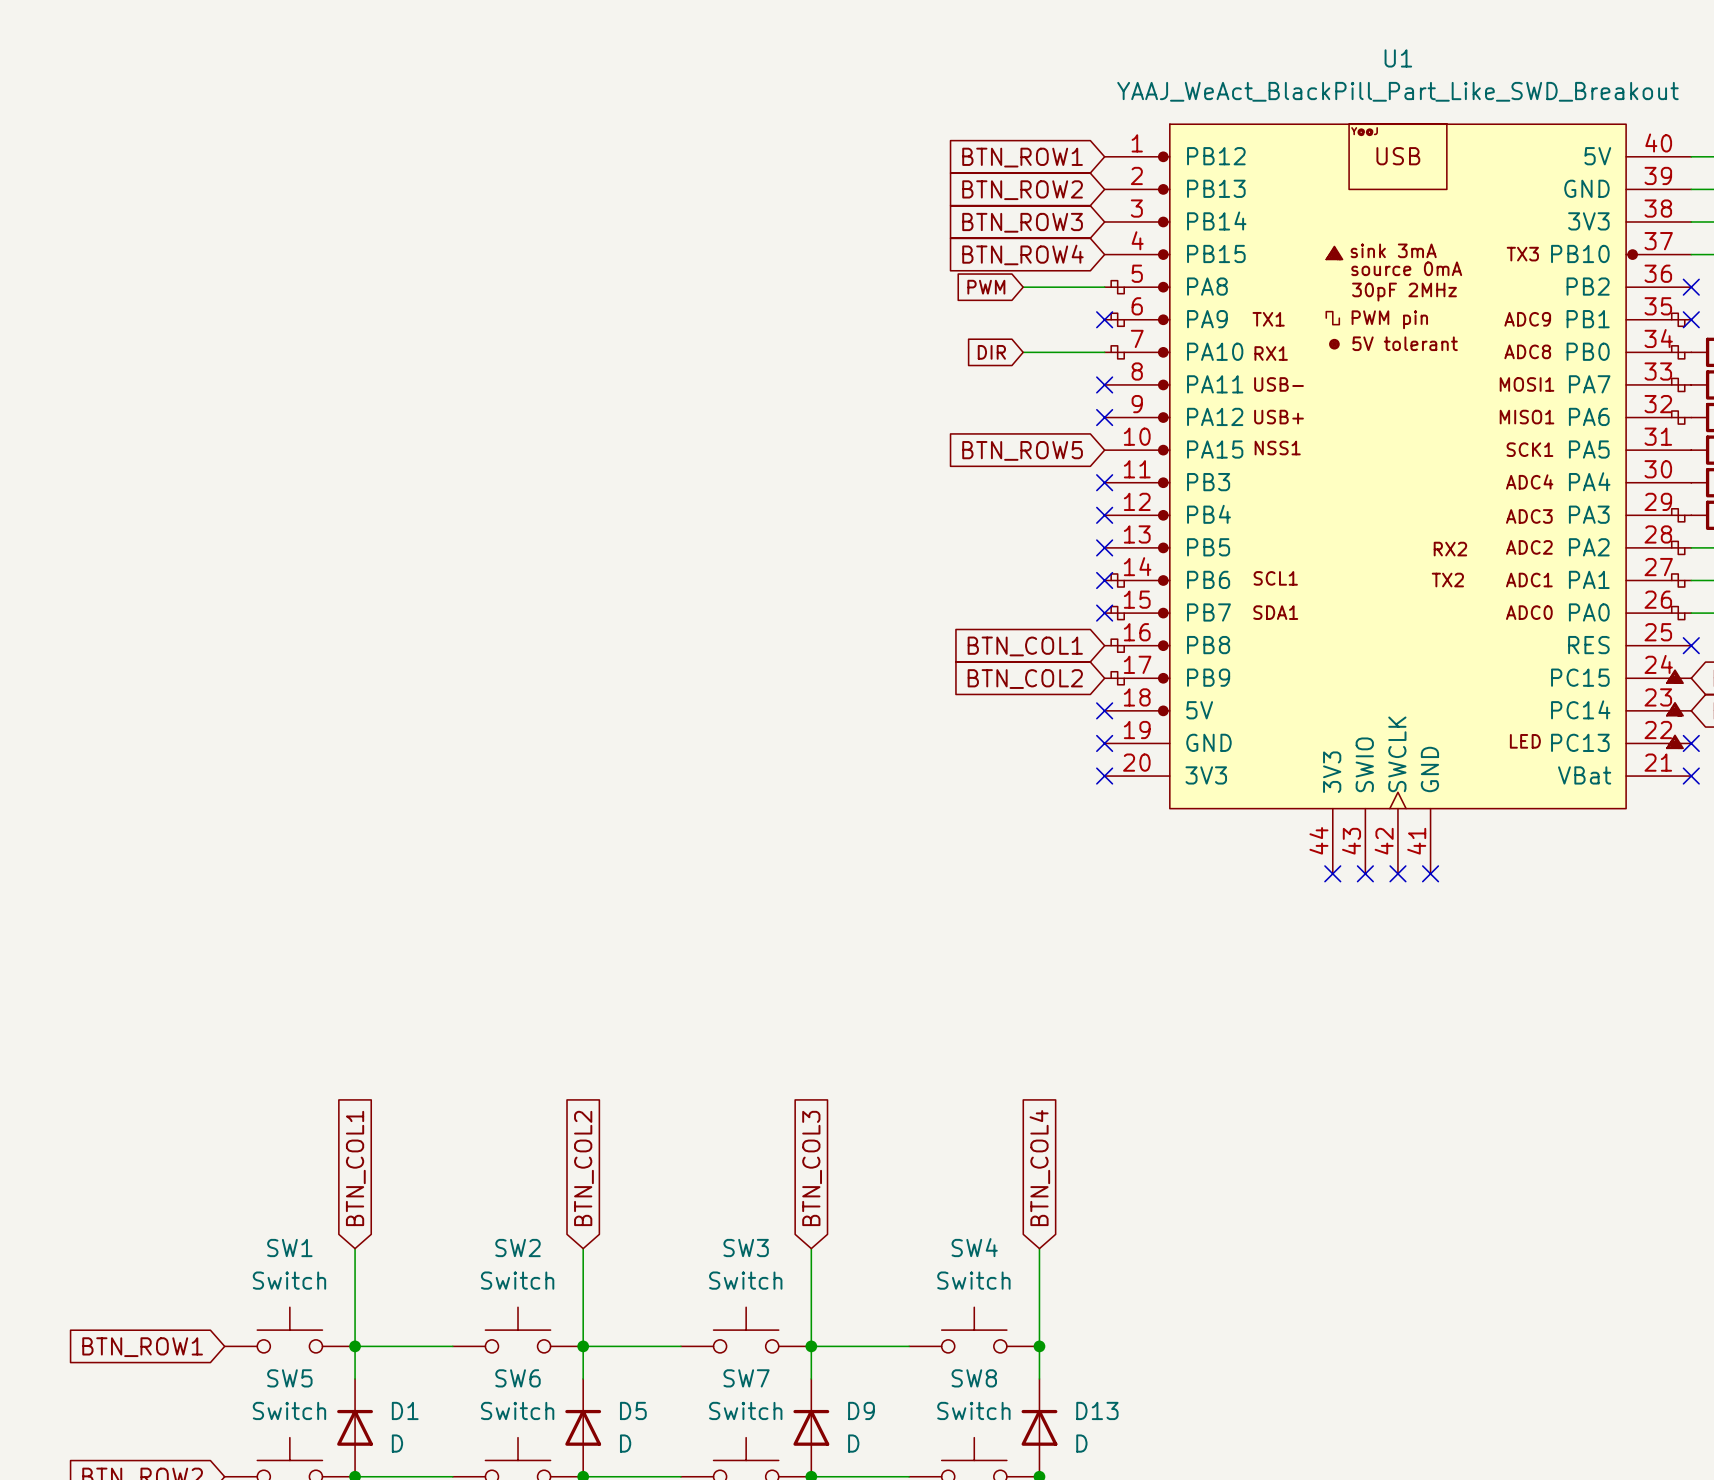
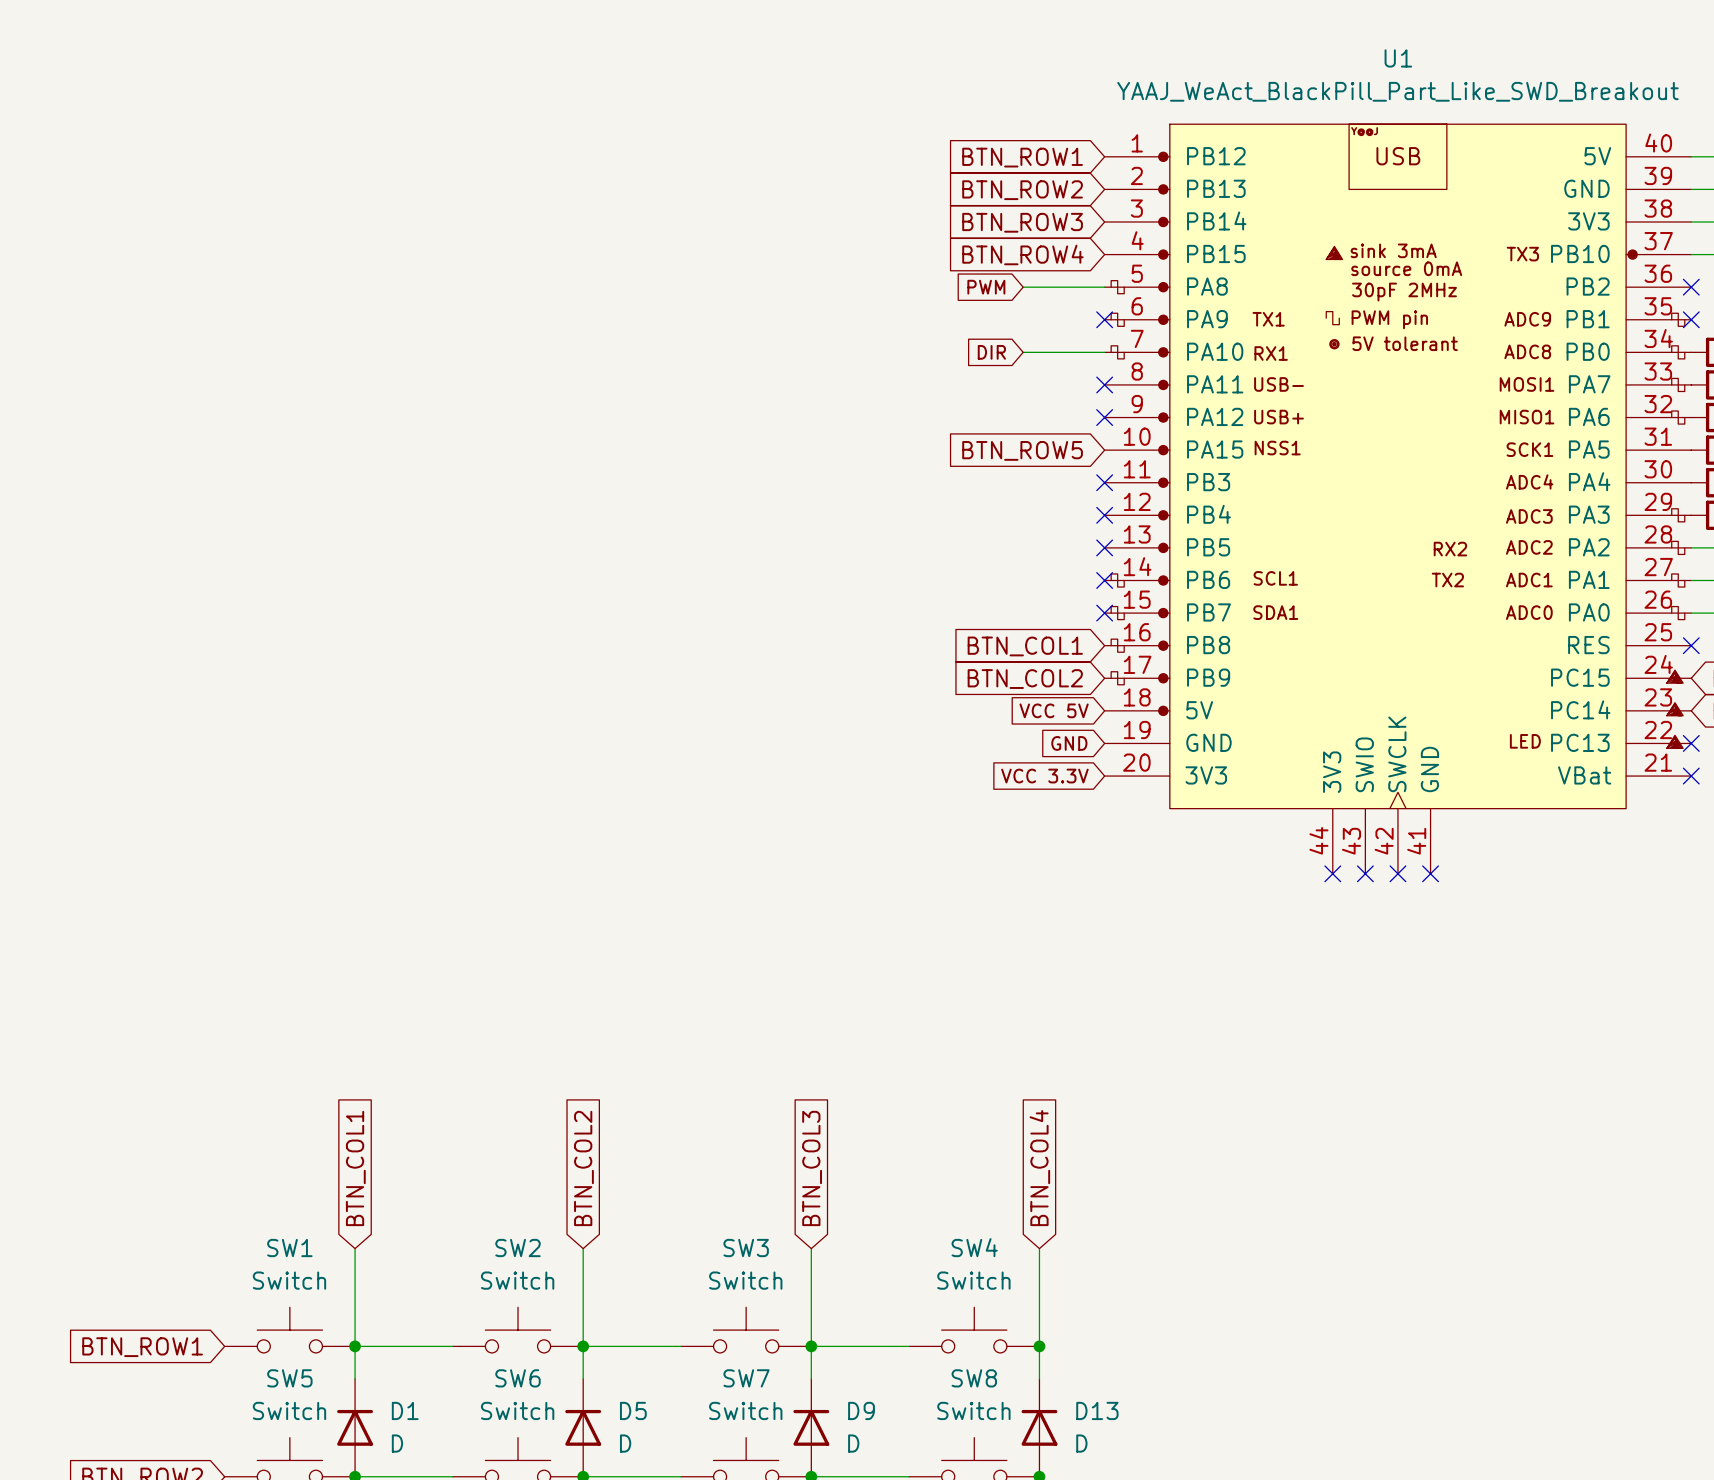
global label: none -> VCC 5V (1054, 710)
no-connect mark: (1104, 710) -> none
global label: none -> GND (1069, 743)
no-connect mark: (1104, 743) -> none
global label: none -> VCC 3.3V (1044, 776)
no-connect mark: (1104, 776) -> none

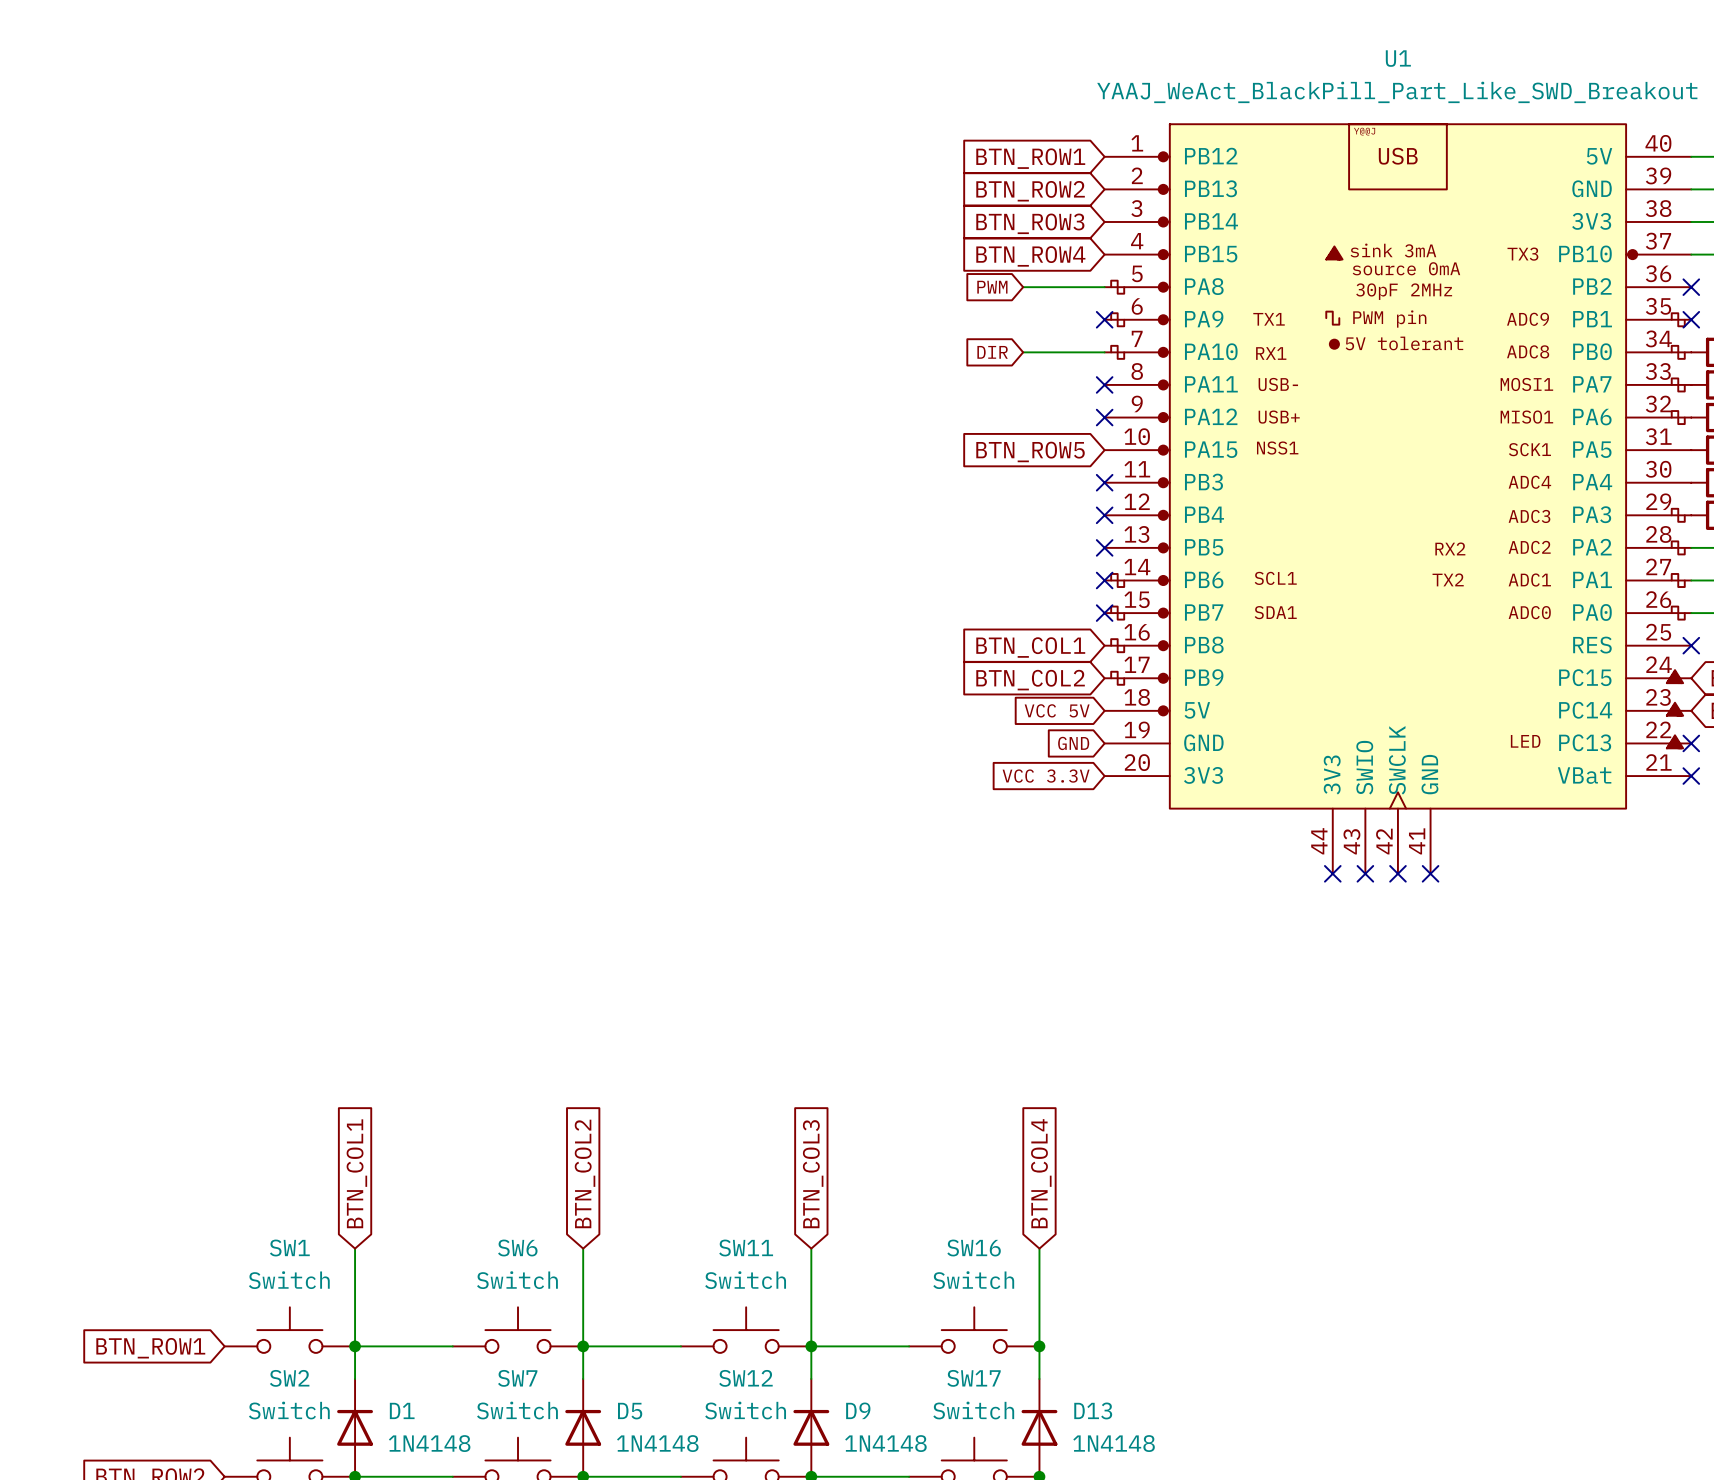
SW4 name: SW4 (974, 1247) -> SW16 (974, 1248)
SW2 name: SW2 (518, 1248) -> SW6 (517, 1248)
SW3 name: SW3 (746, 1248) -> SW11 (746, 1248)
SW5 name: SW5 (289, 1378) -> SW2 (289, 1378)
SW6 name: SW6 (518, 1378) -> SW7 (517, 1378)
SW7 name: SW7 (746, 1378) -> SW12 (745, 1378)
SW8 name: SW8 (974, 1378) -> SW17 (974, 1378)
D1 value: D (397, 1443) -> 1N4148 (429, 1443)
D5 value: D (625, 1443) -> 1N4148 (657, 1443)
D9 value: D (853, 1443) -> 1N4148 (885, 1443)
D13 value: D (1081, 1443) -> 1N4148 (1114, 1443)

